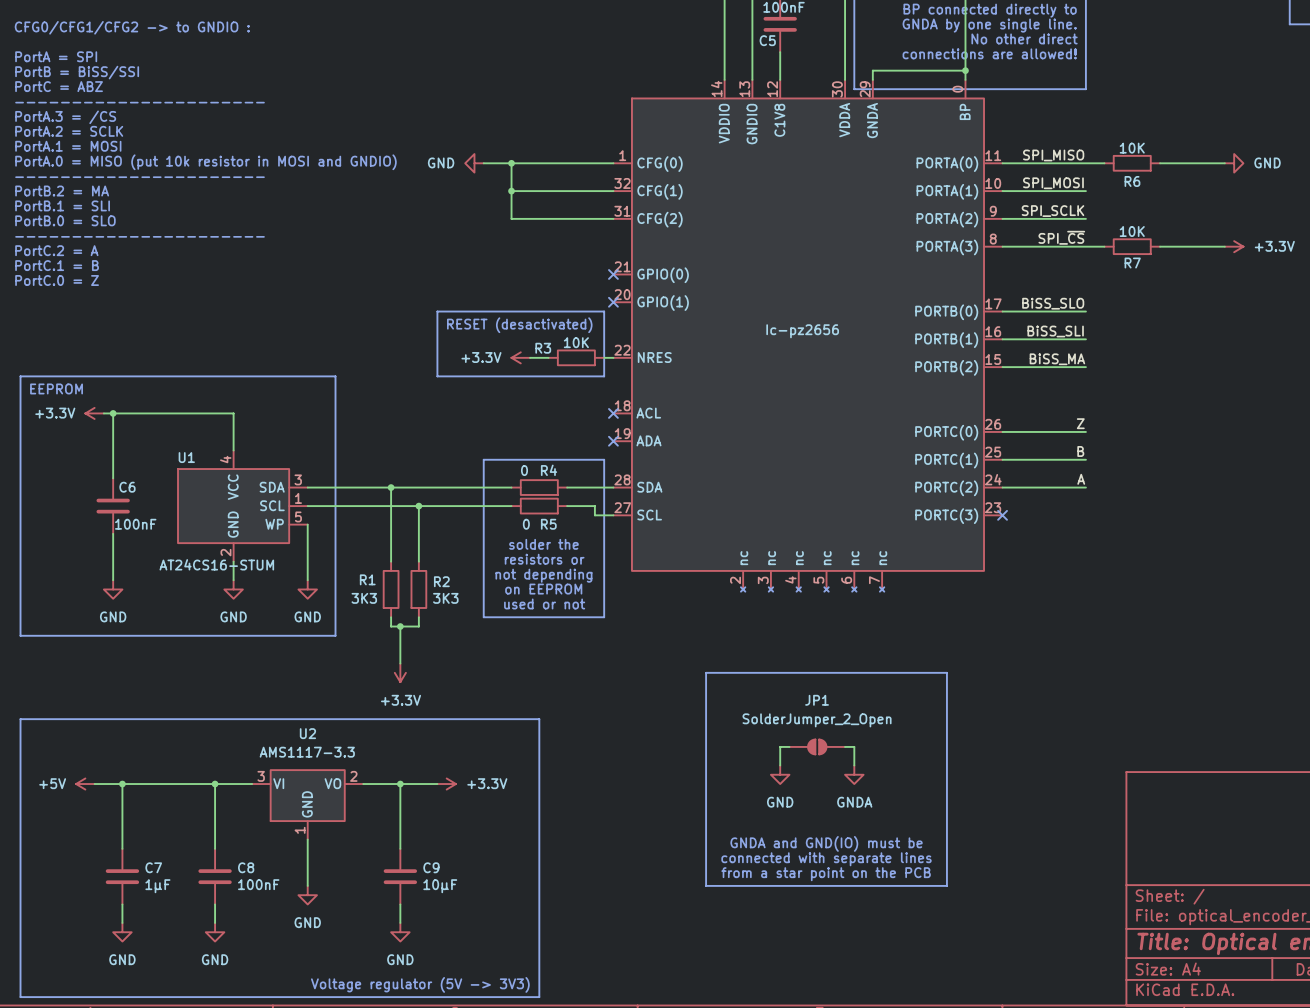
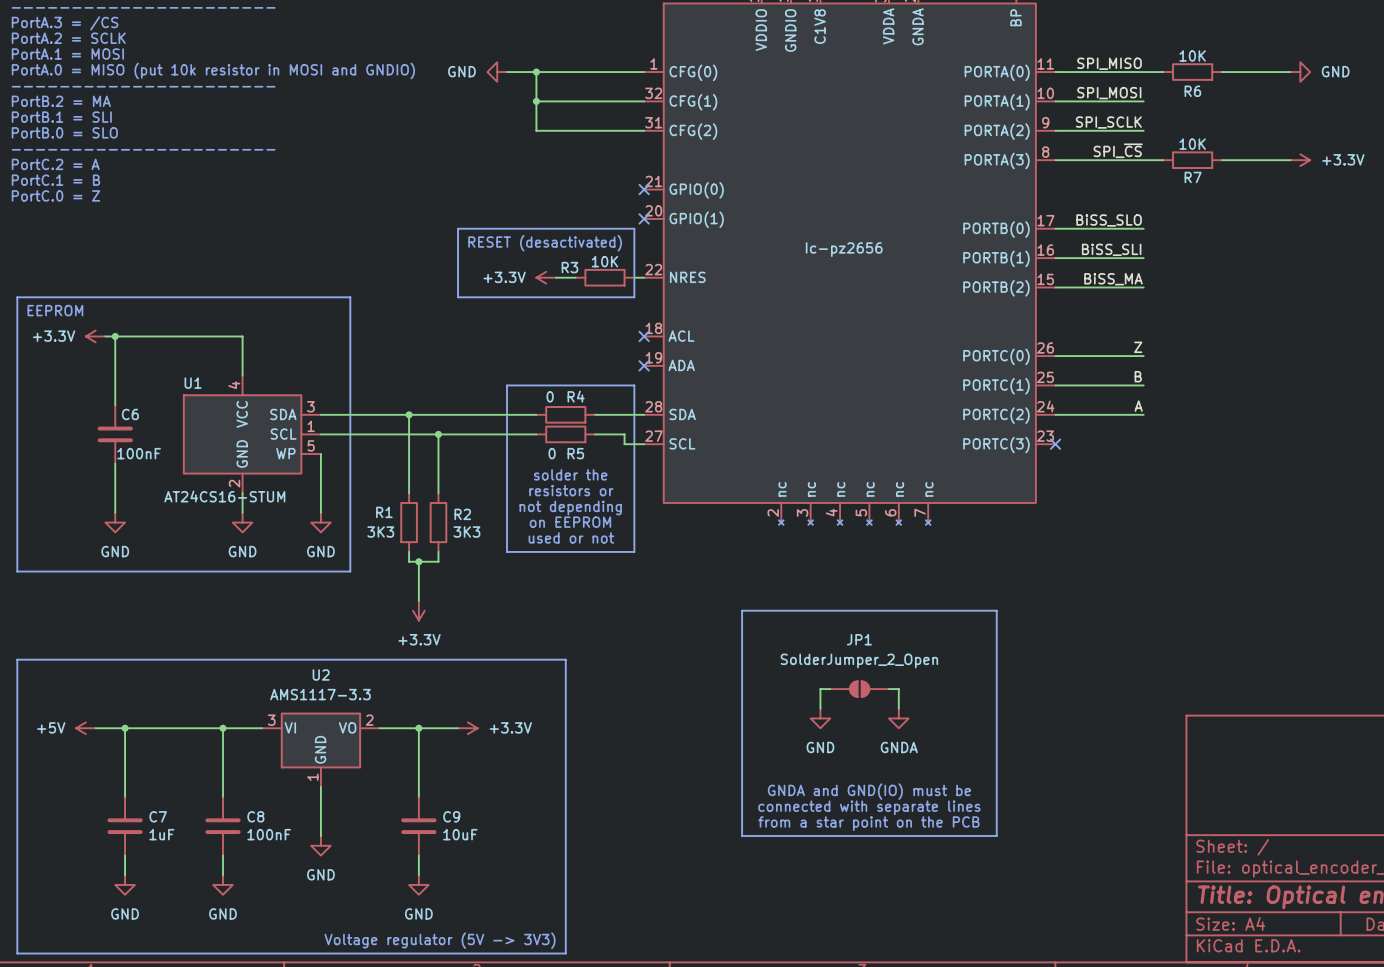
C7 value: 1μF (157, 886) -> 1uF (161, 834)
C9 value: 10μF (440, 886) -> 10uF (460, 834)

